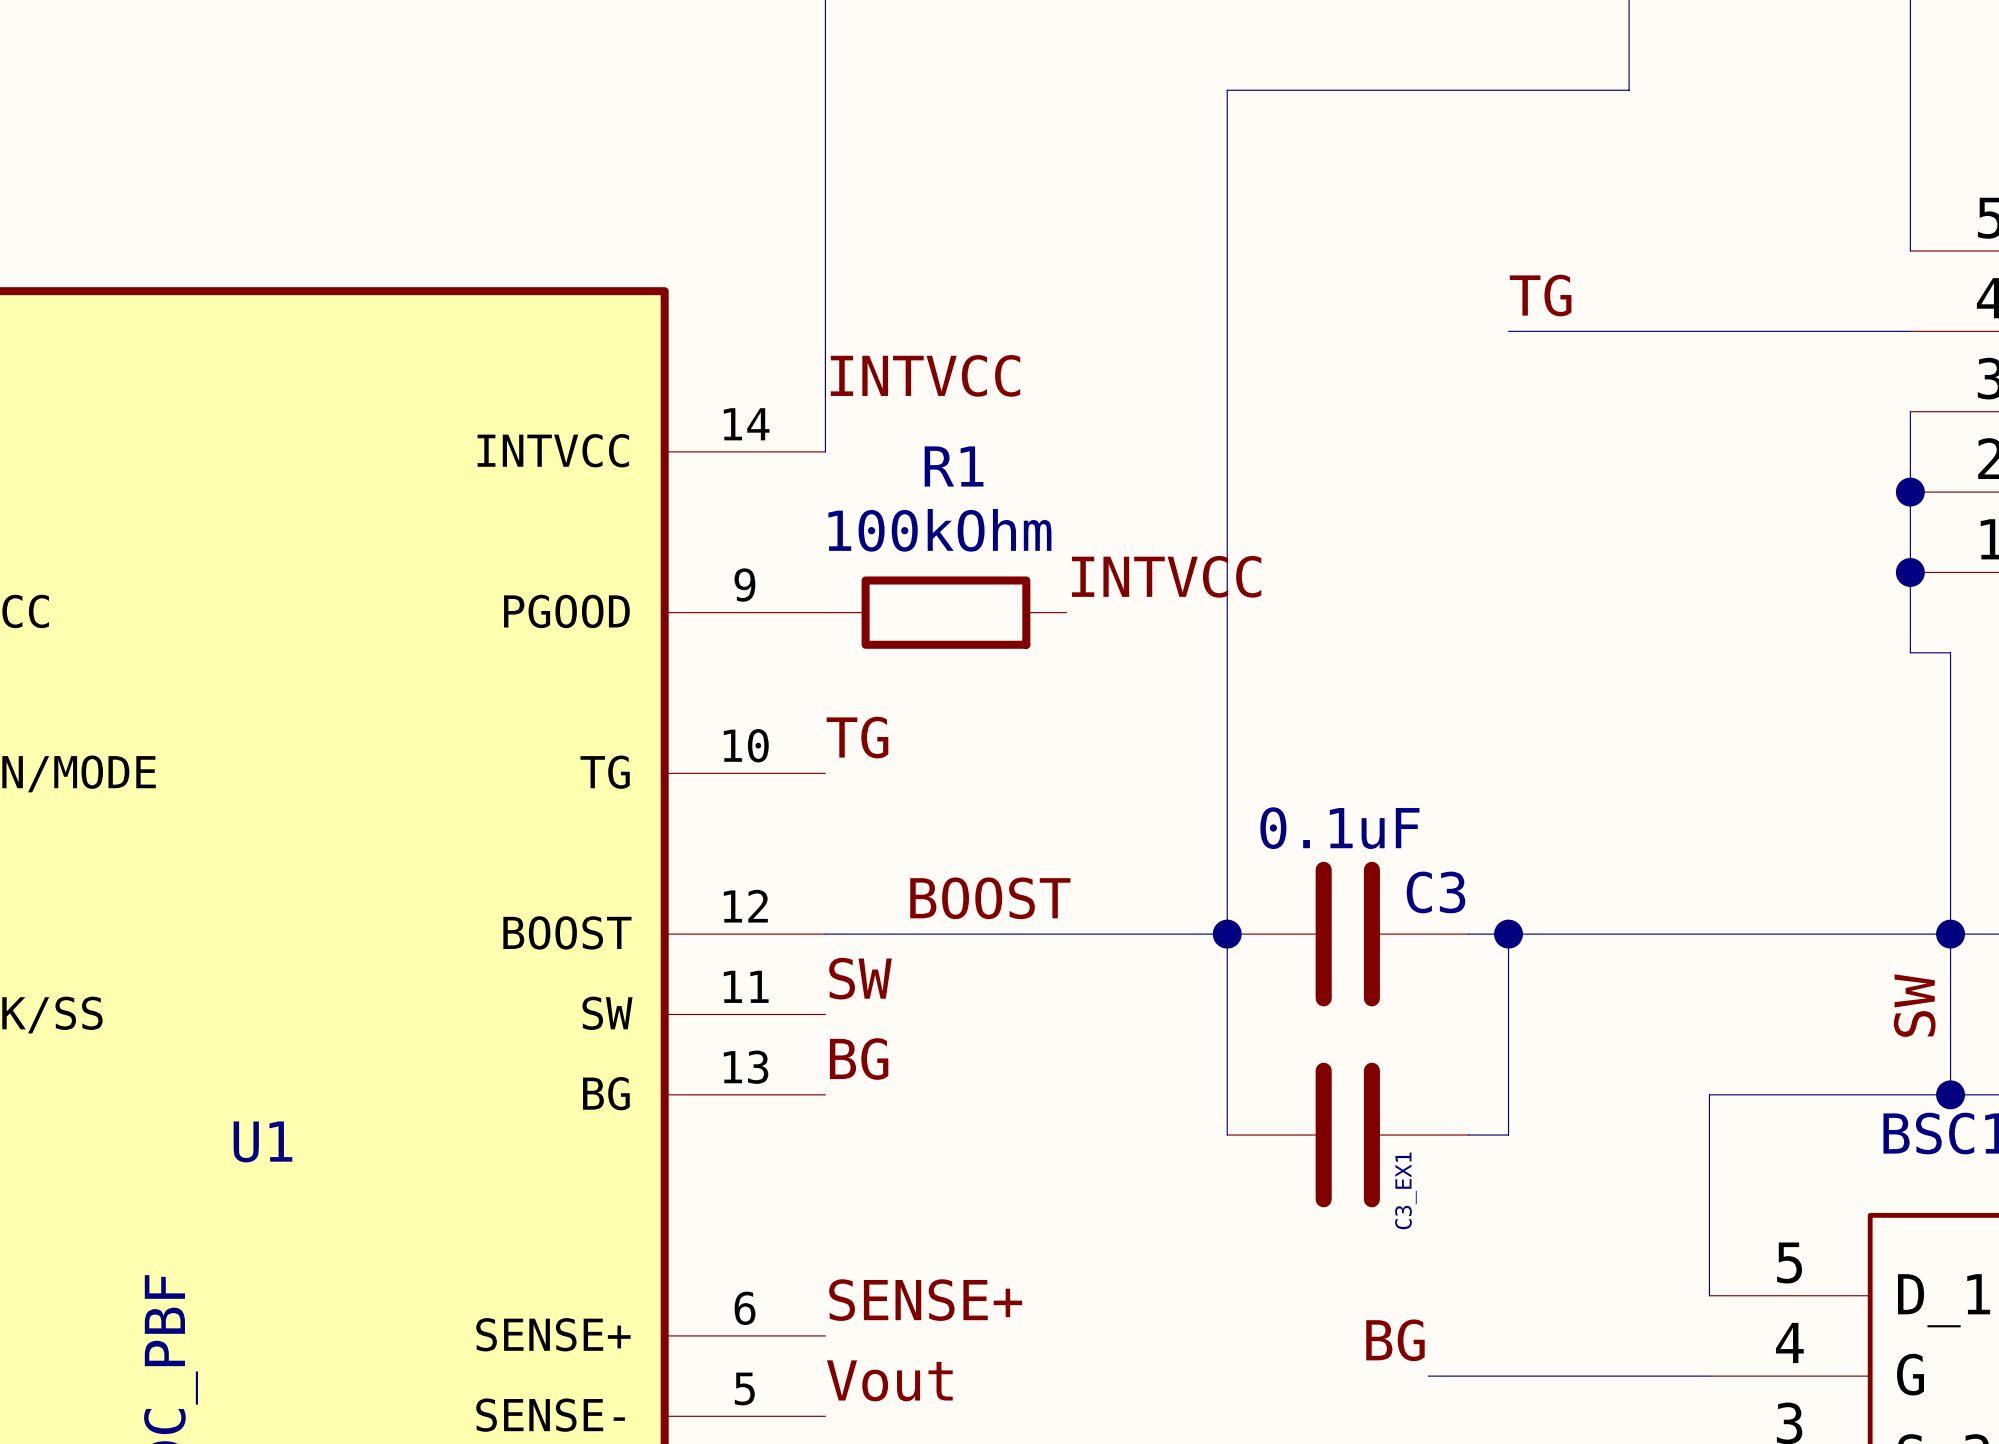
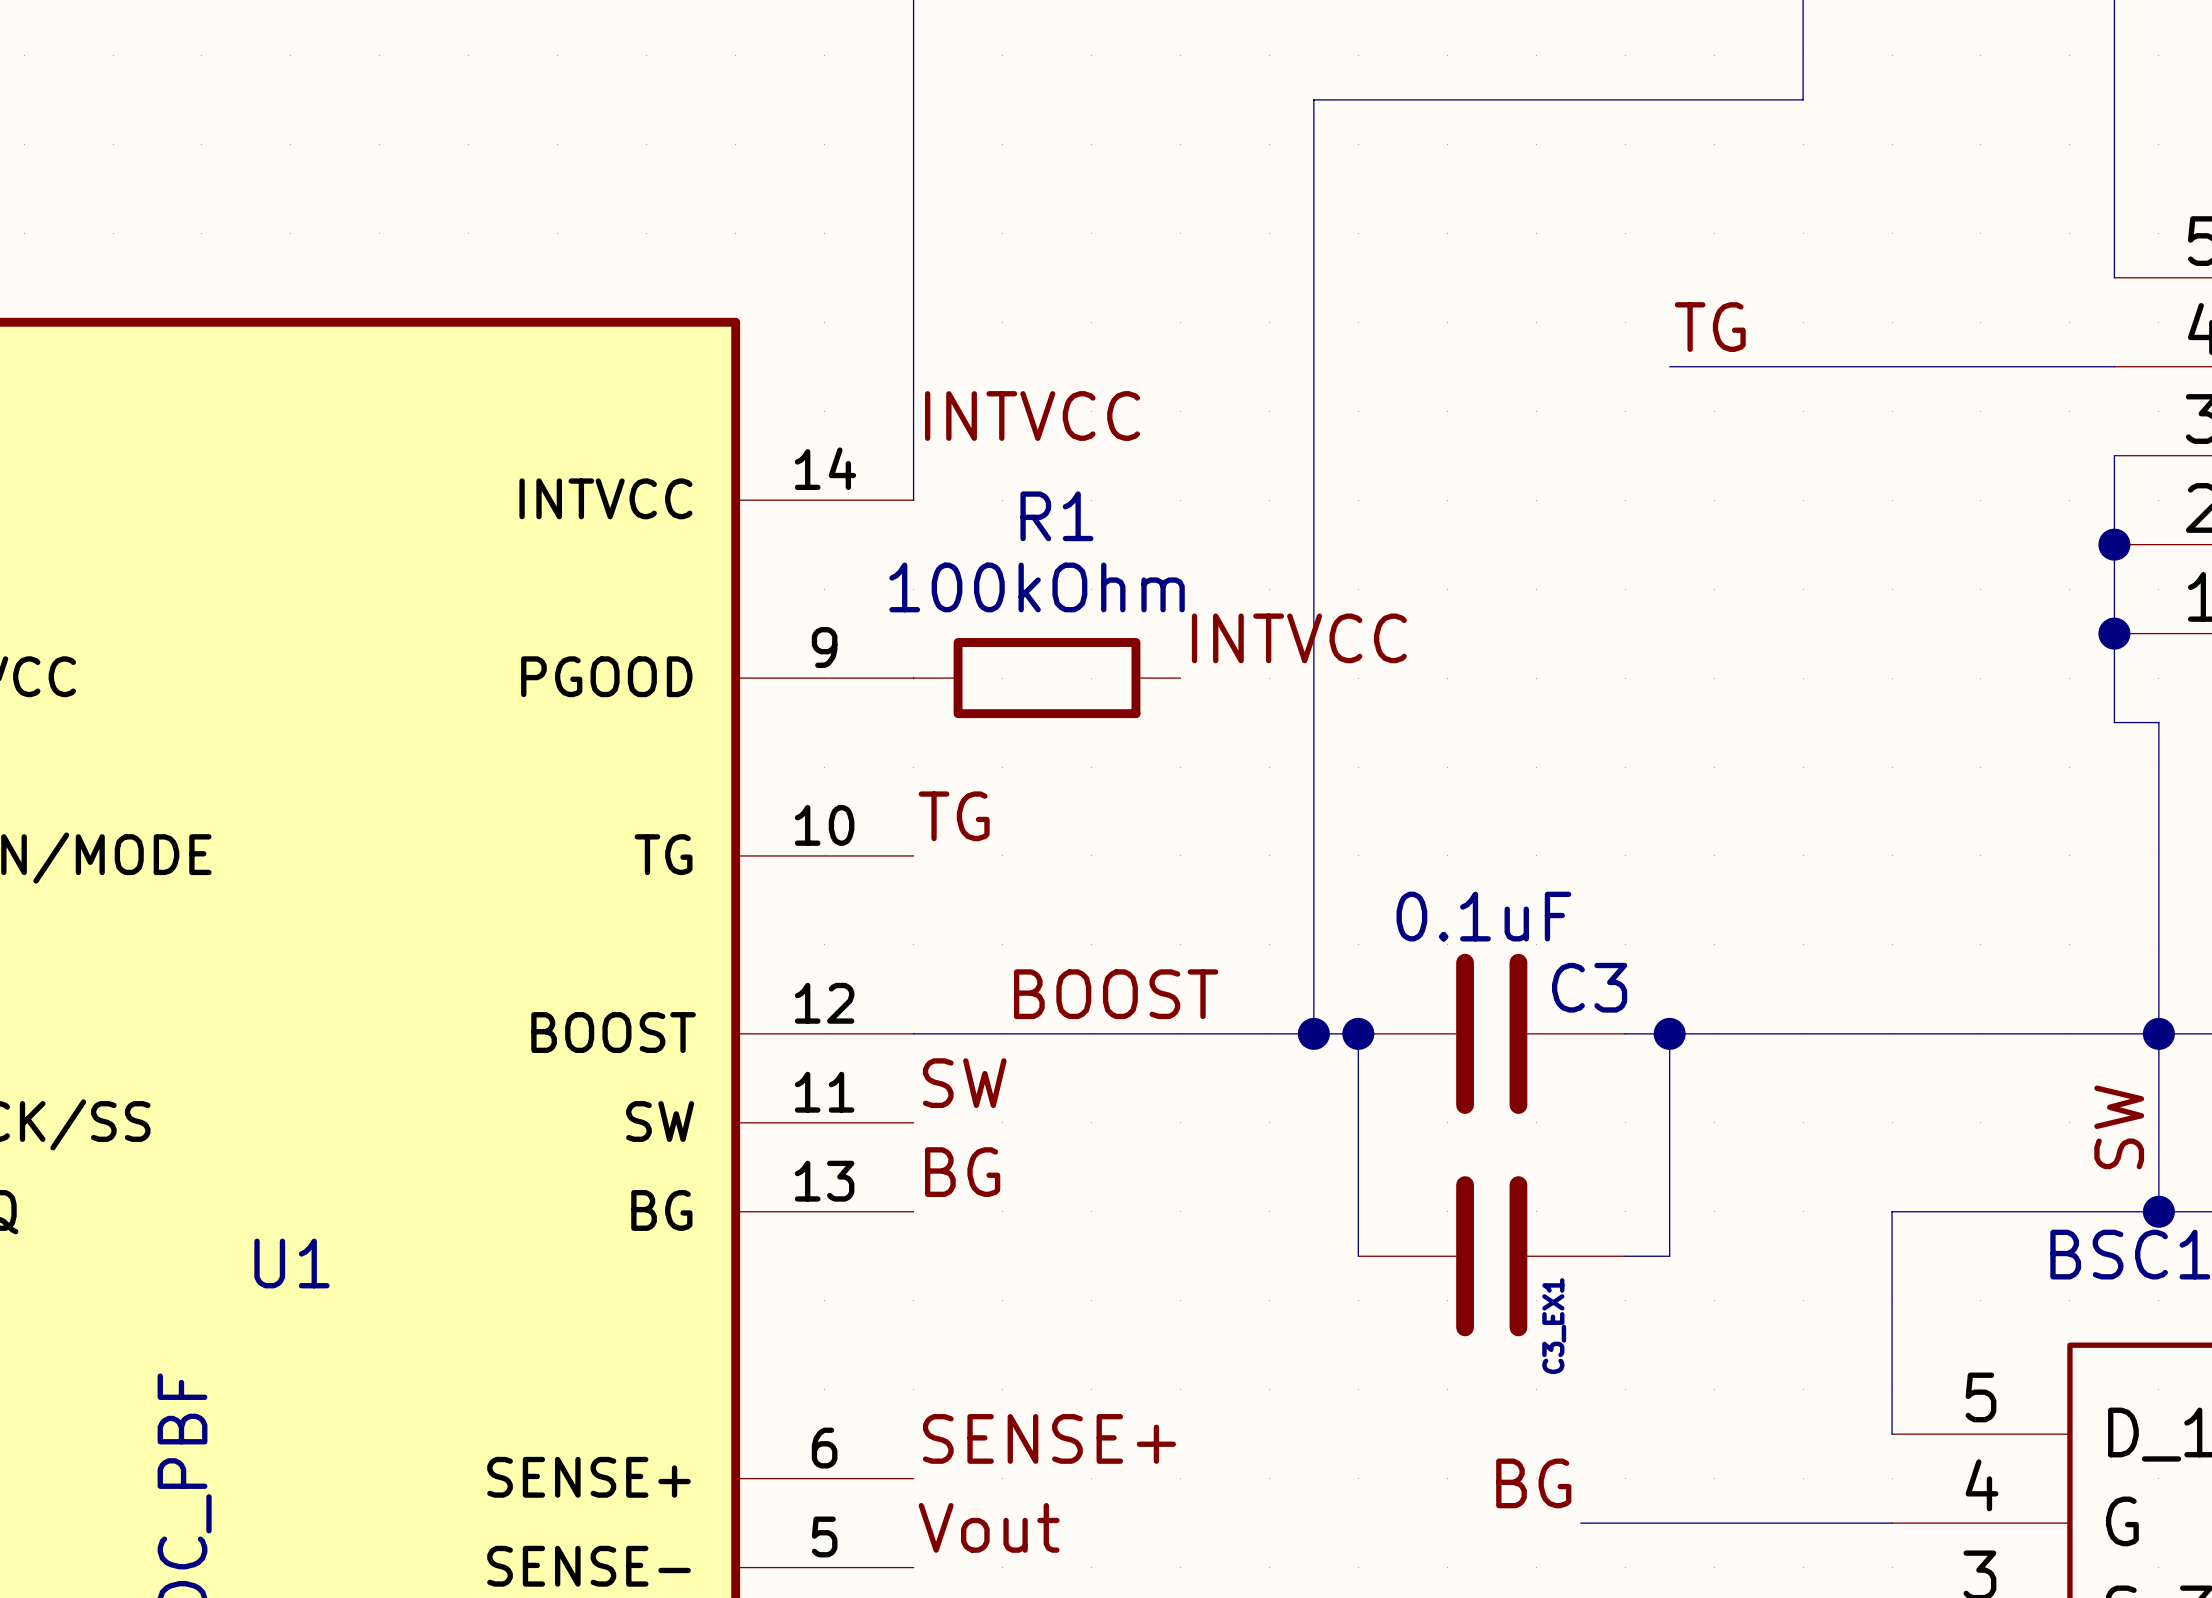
wire: (1227, 90) (1227, 934) -> (1358, 99) (1313, 99) (1313, 1033)
junction: none -> (1313, 1033)

